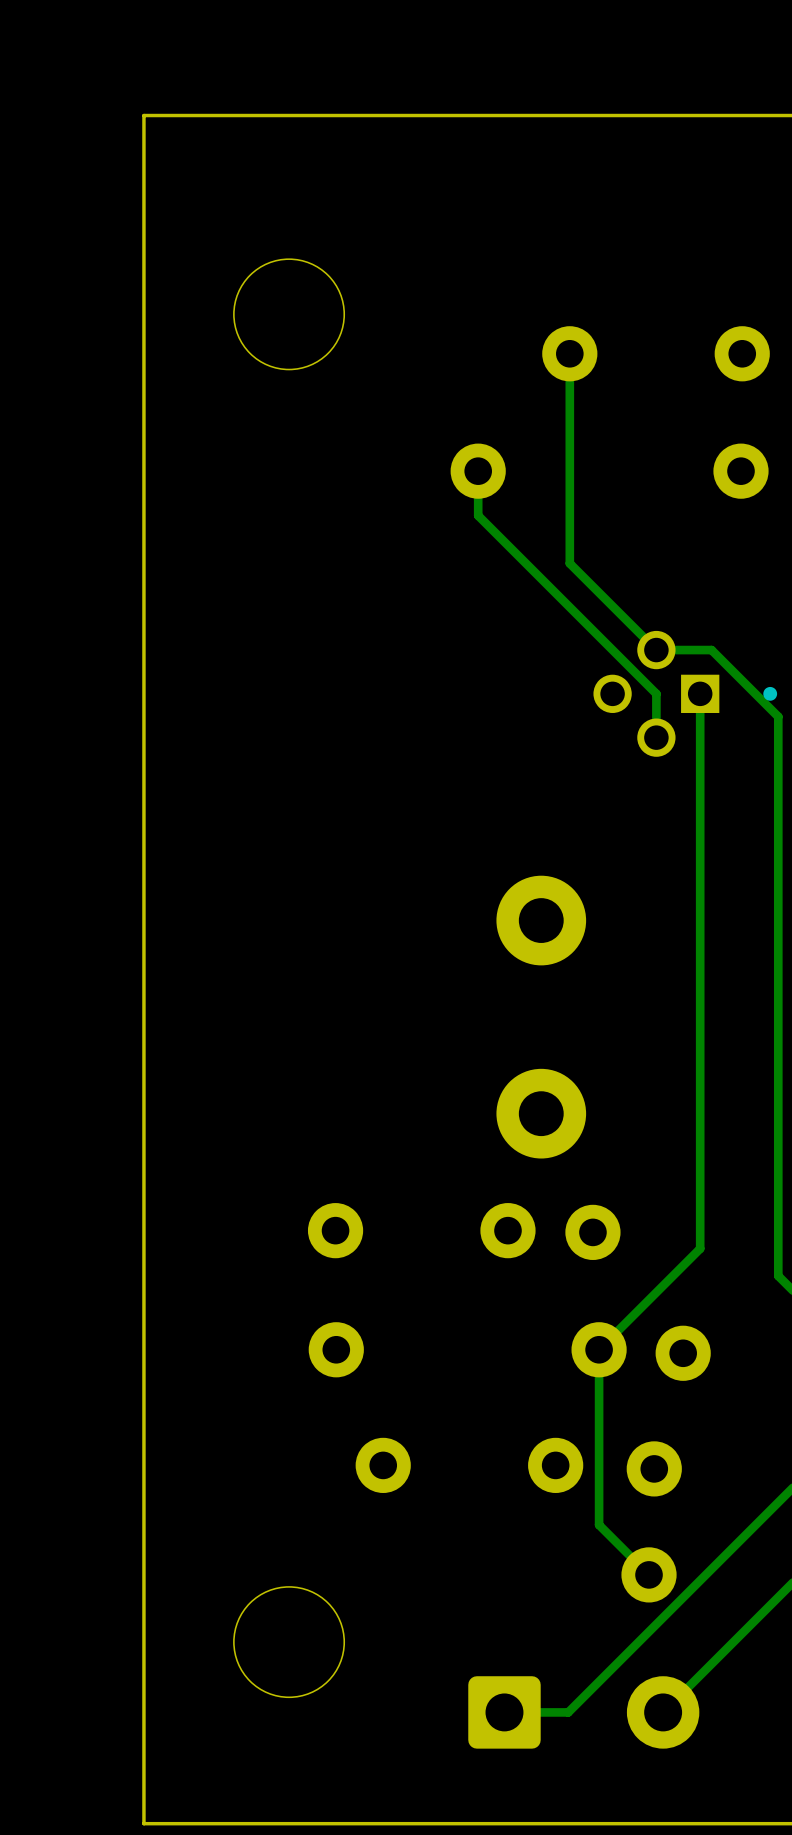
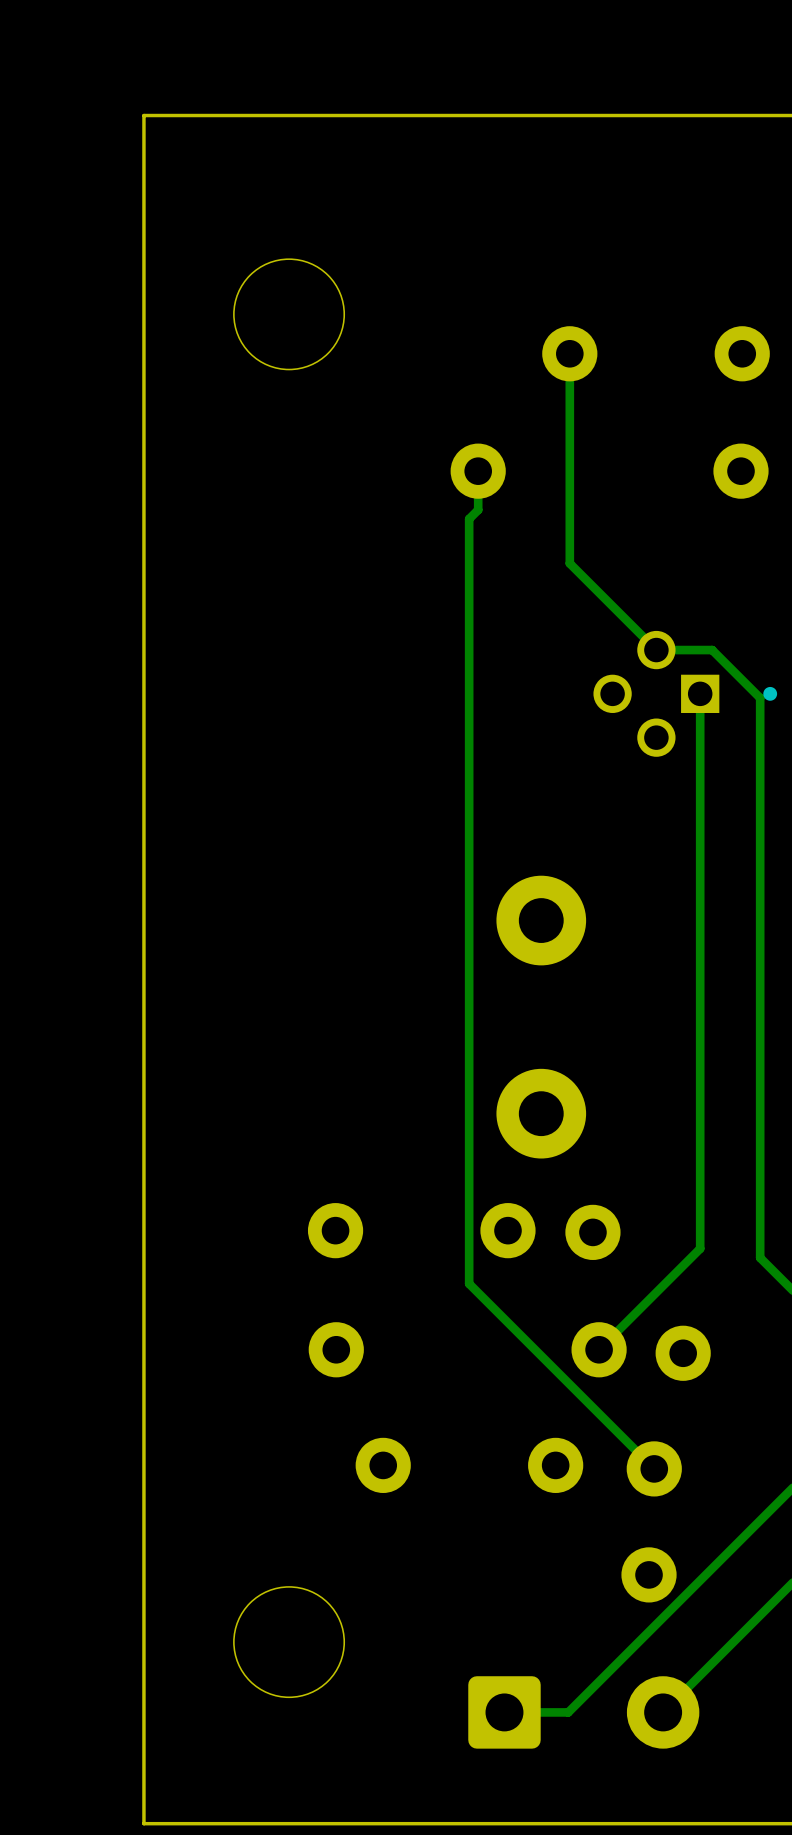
track: (478, 509) (478, 515) (656, 693) (656, 737) -> (478, 509) (469, 519) (469, 1283) (654, 1468)
track: (711, 650) (778, 716) (778, 1275) -> (712, 650) (760, 698) (760, 1257) (778, 1275)
track: (599, 1349) (599, 1524) (649, 1574) -> none

